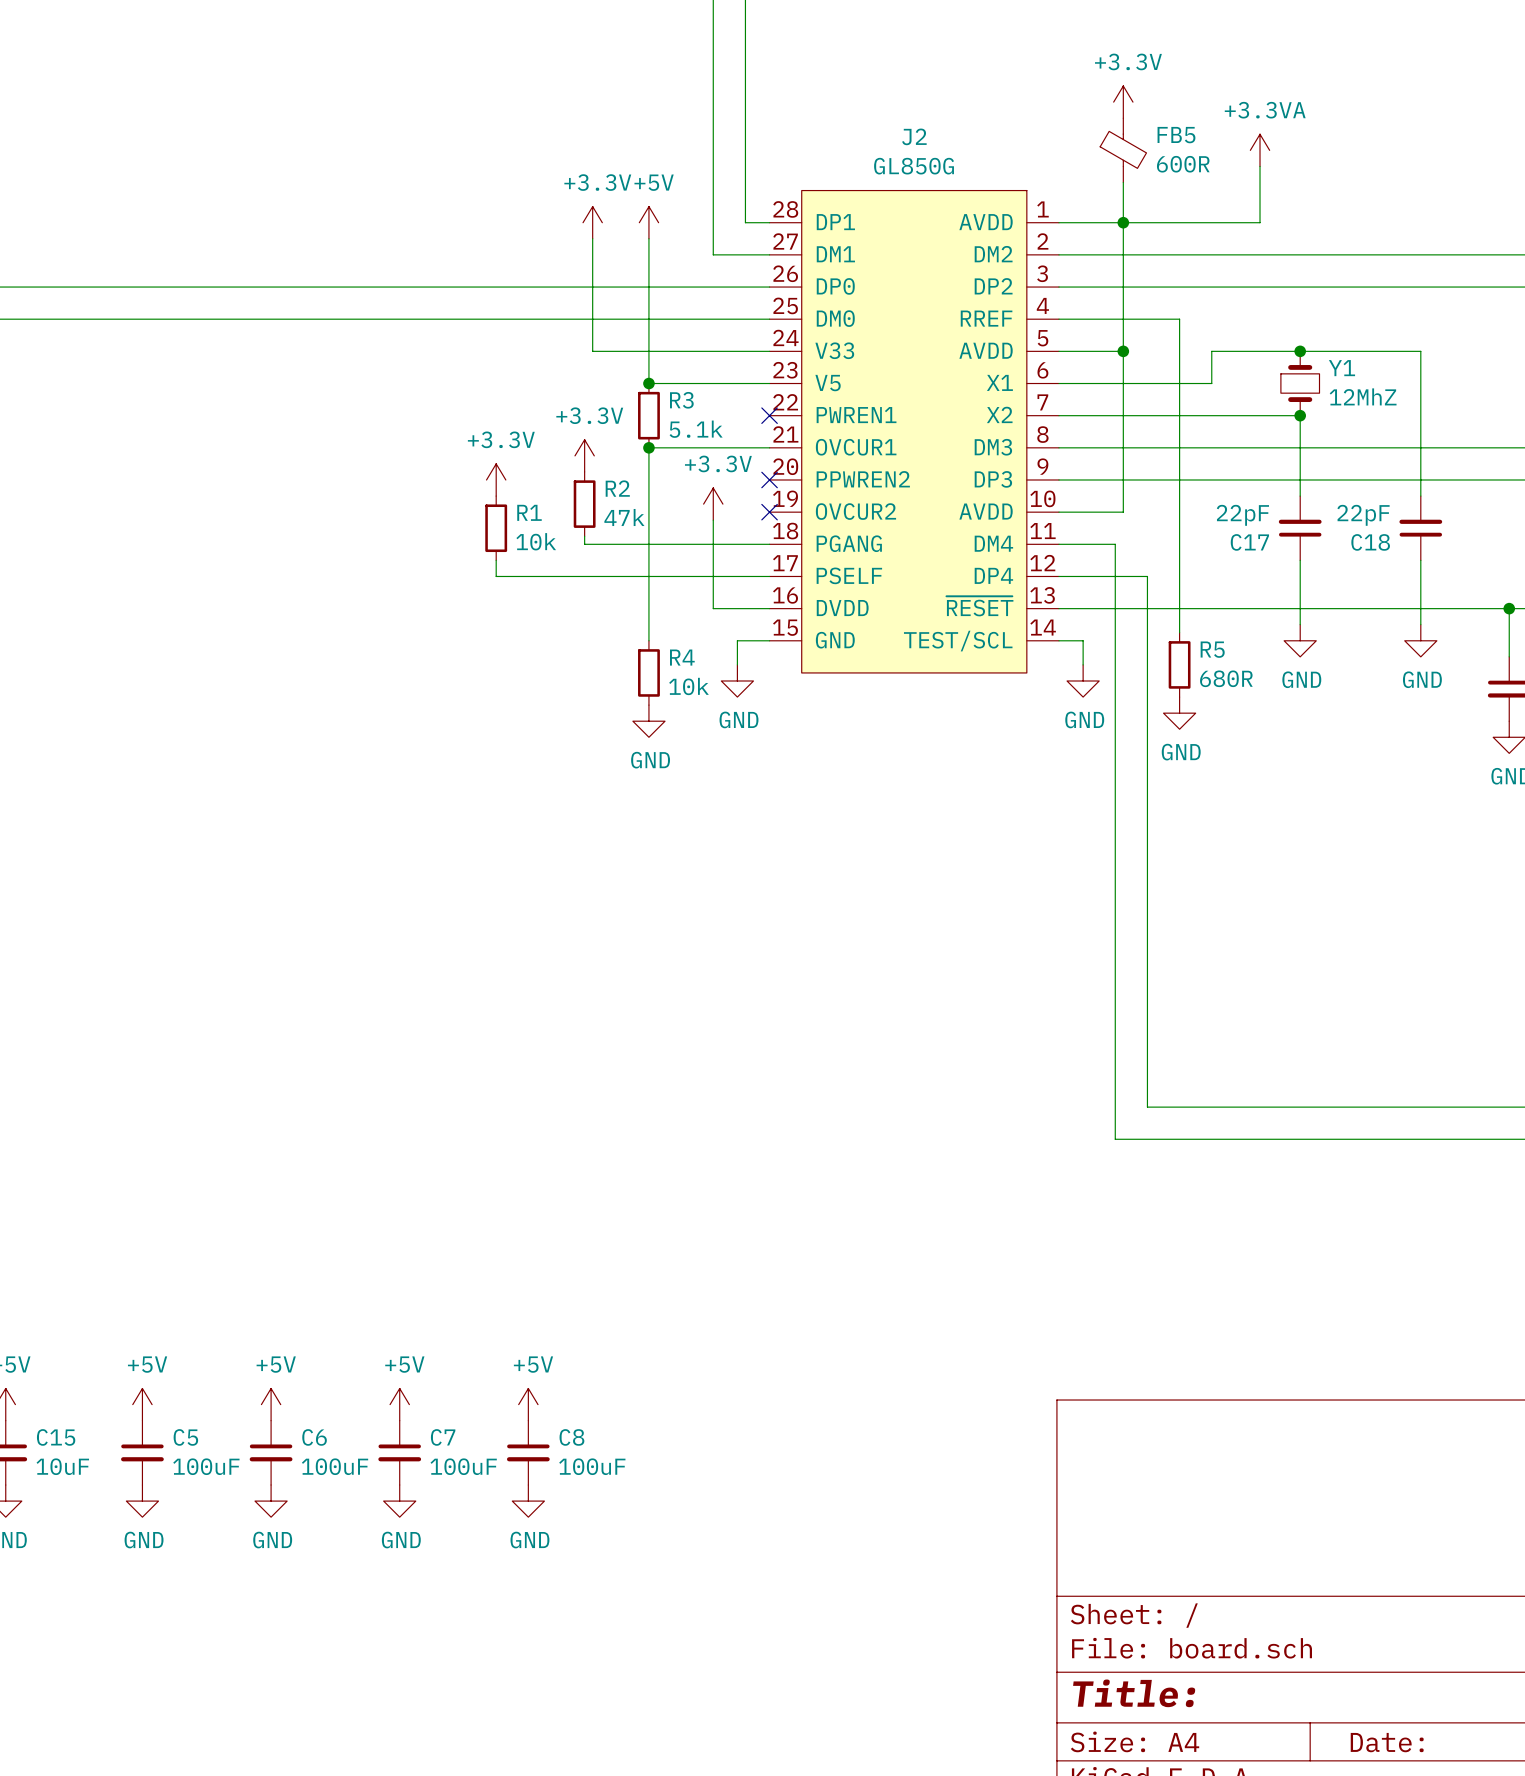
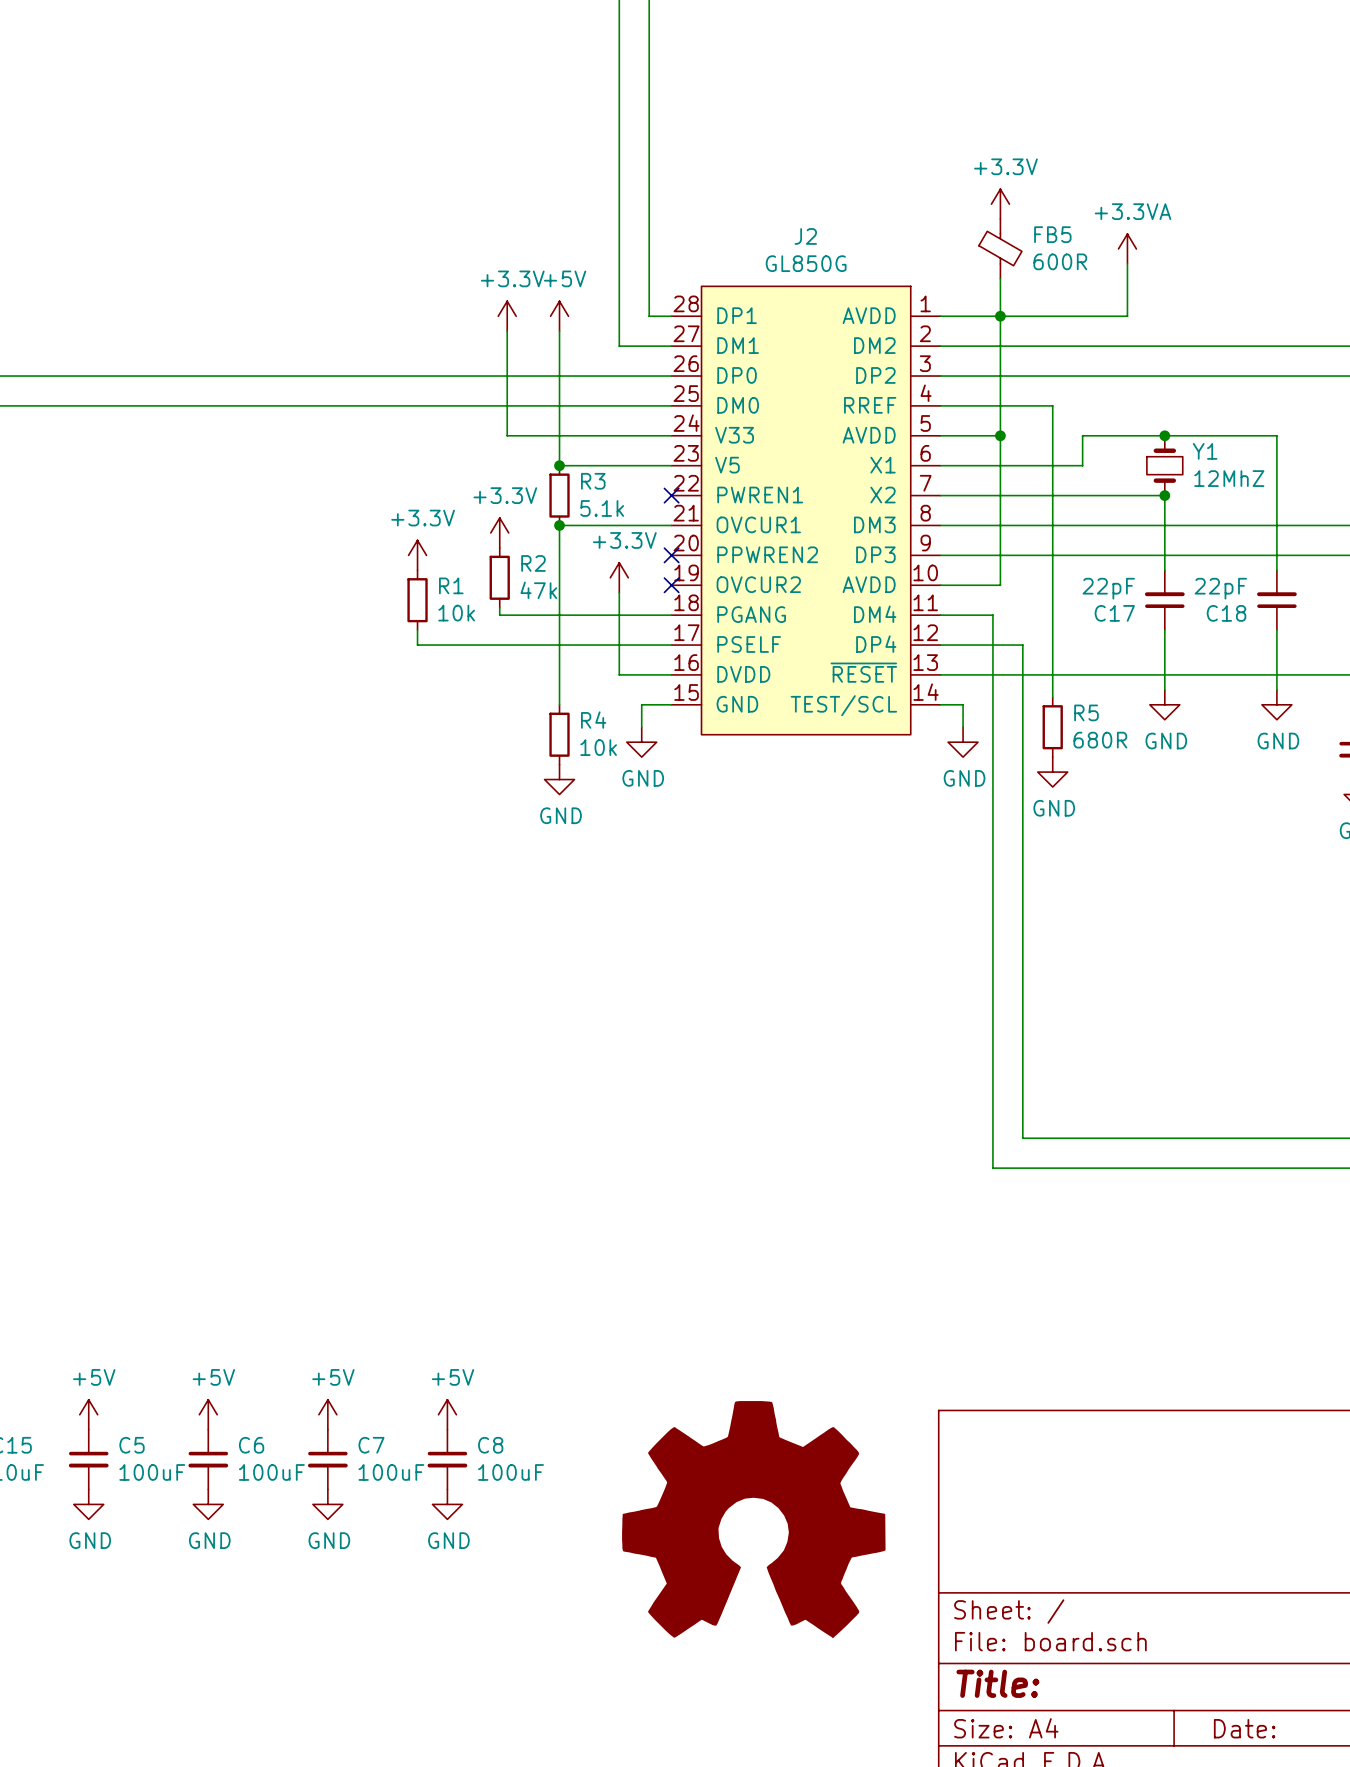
part: none -> (753, 1519)

